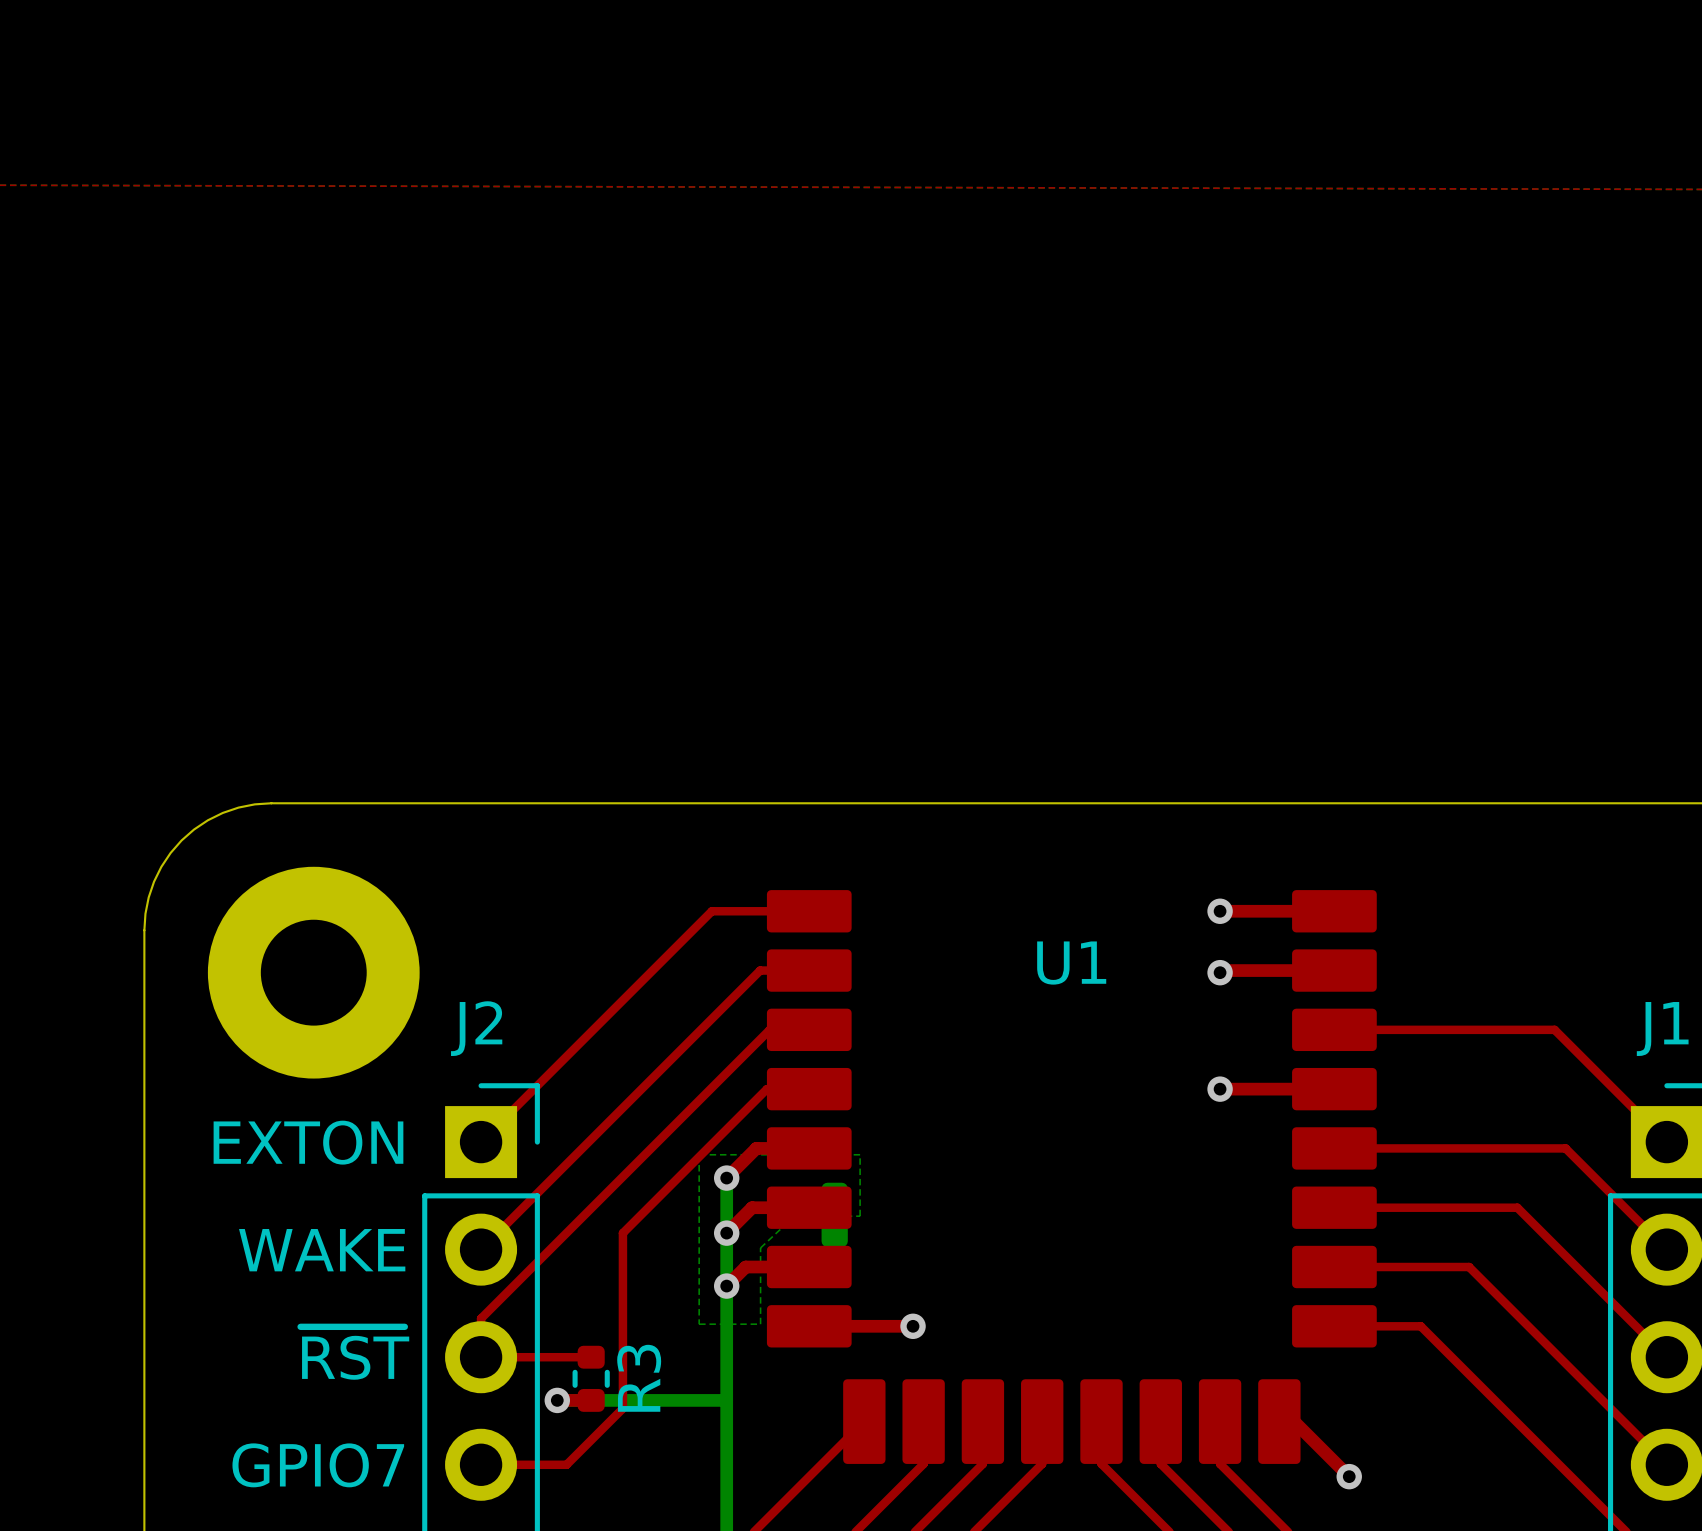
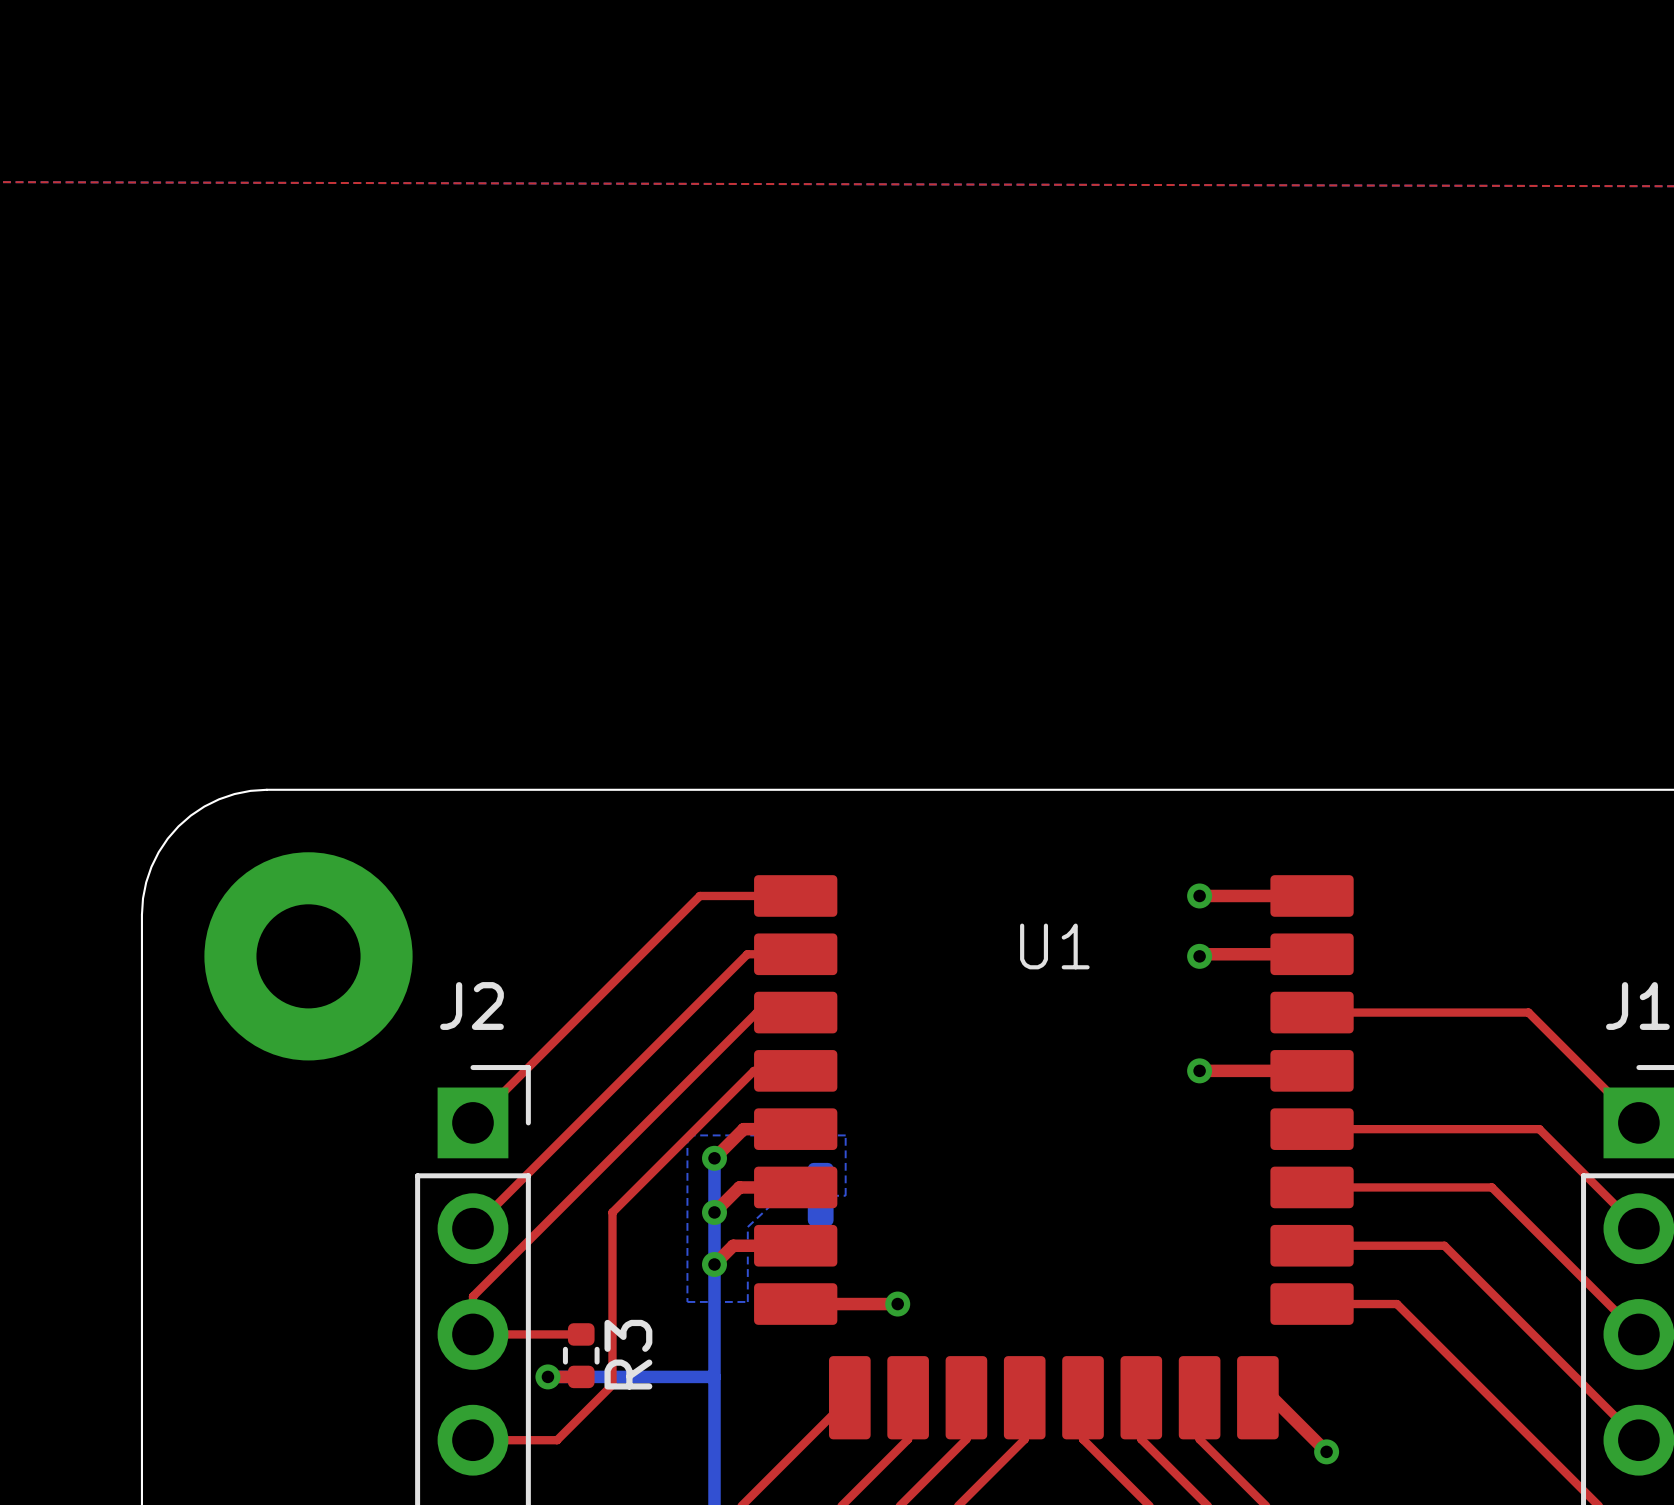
text: EXTON (308, 1142) -> none
text: WAKE (322, 1250) -> none
text: ~{RST} (354, 1353) -> none
text: GPIO7 (318, 1465) -> none

